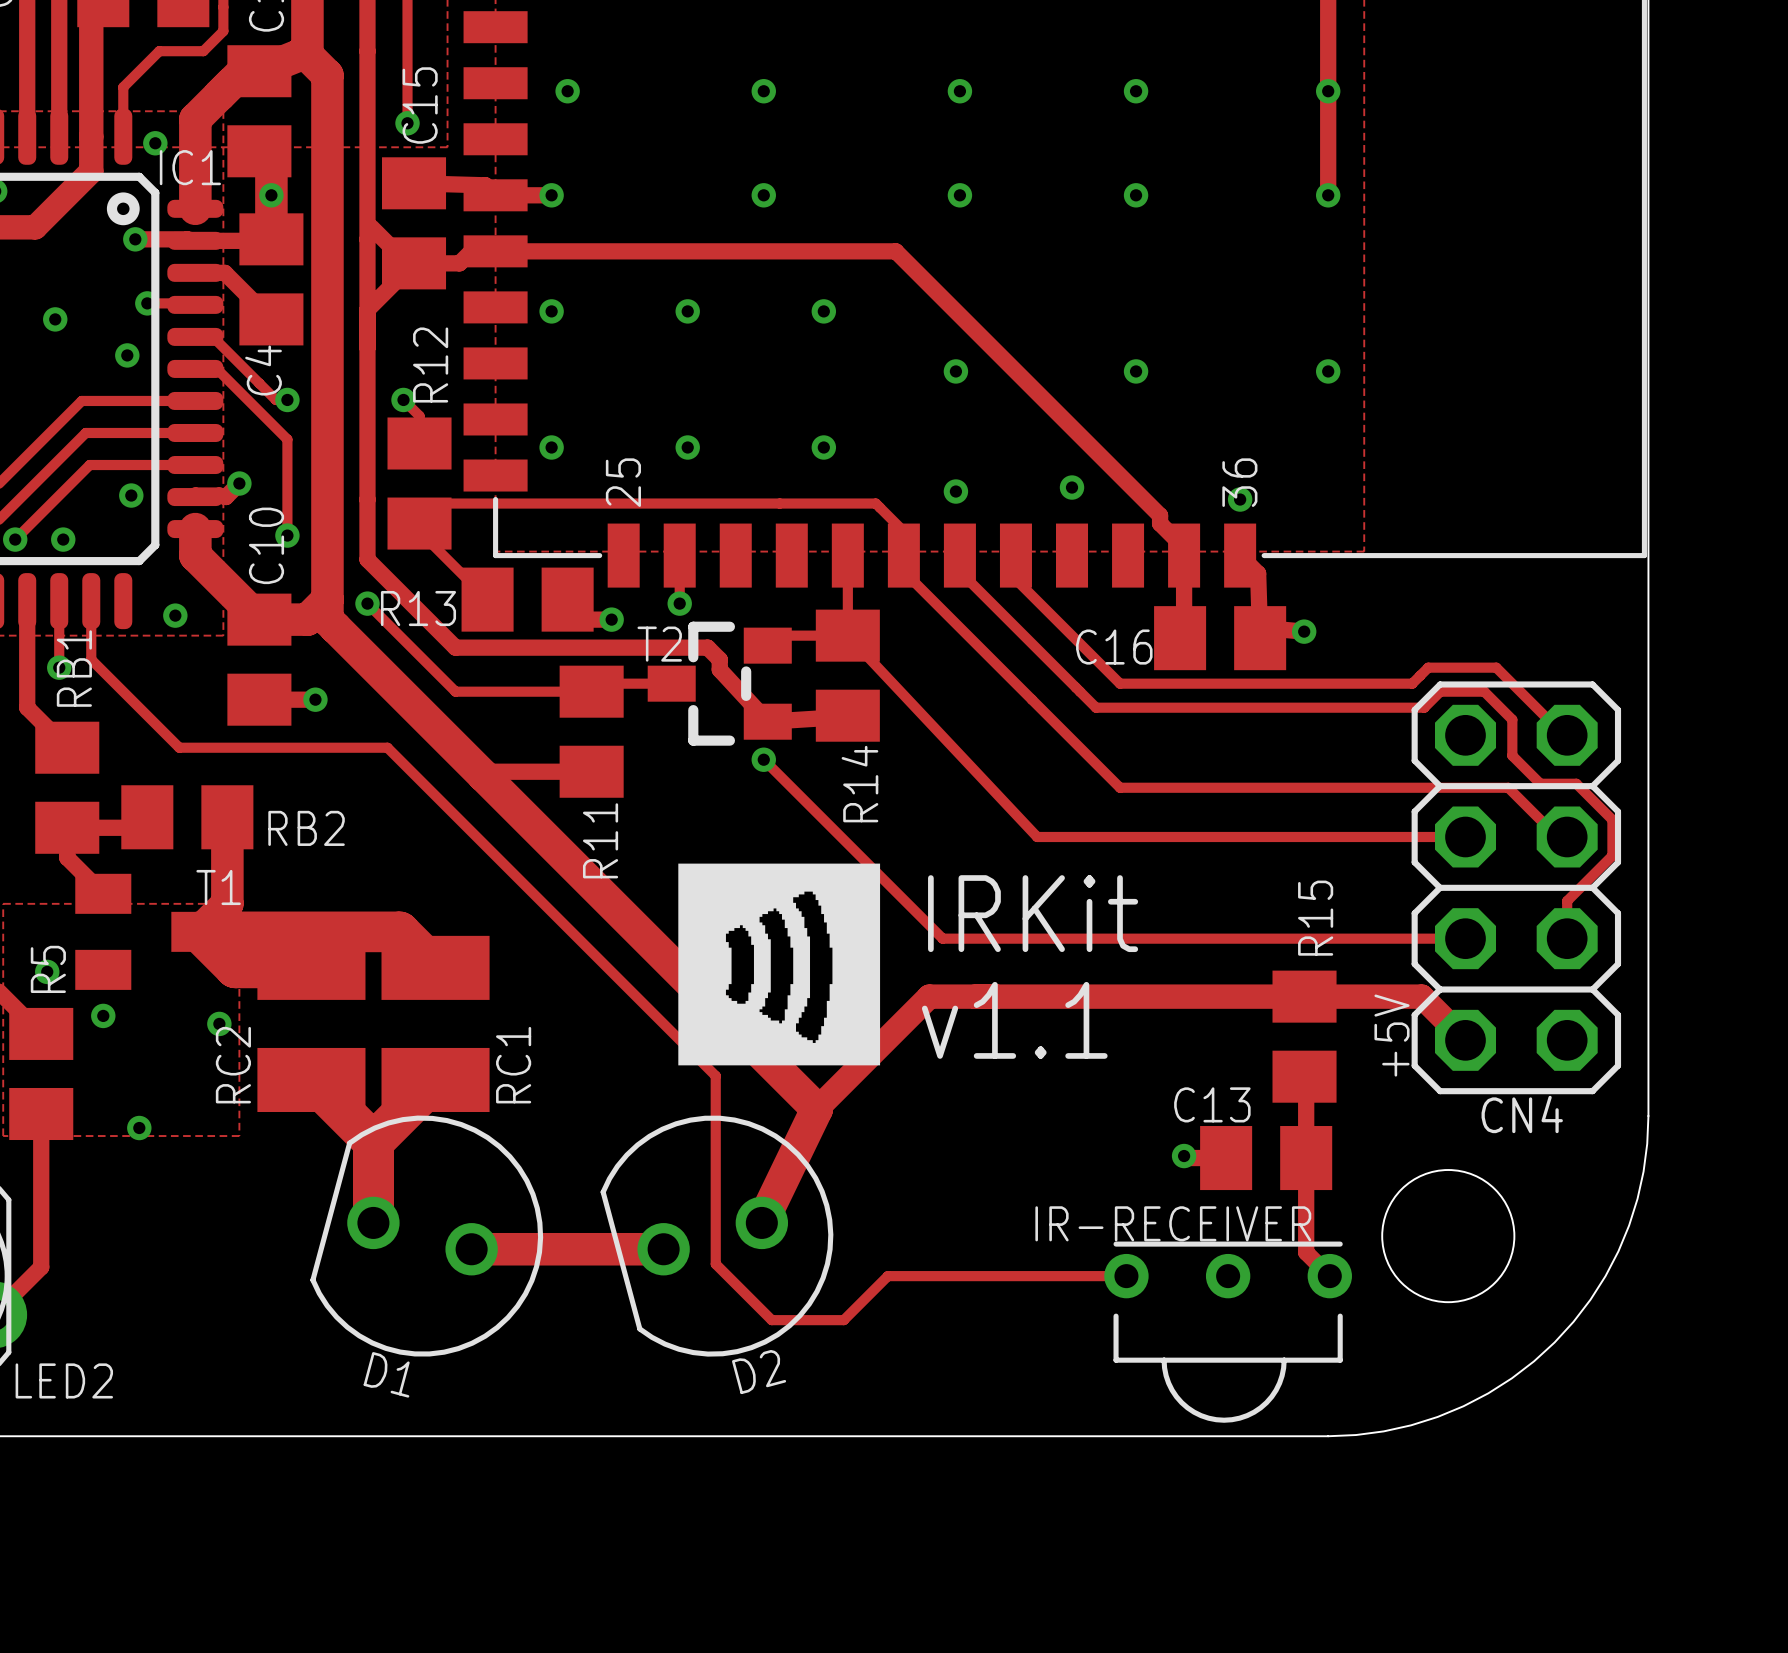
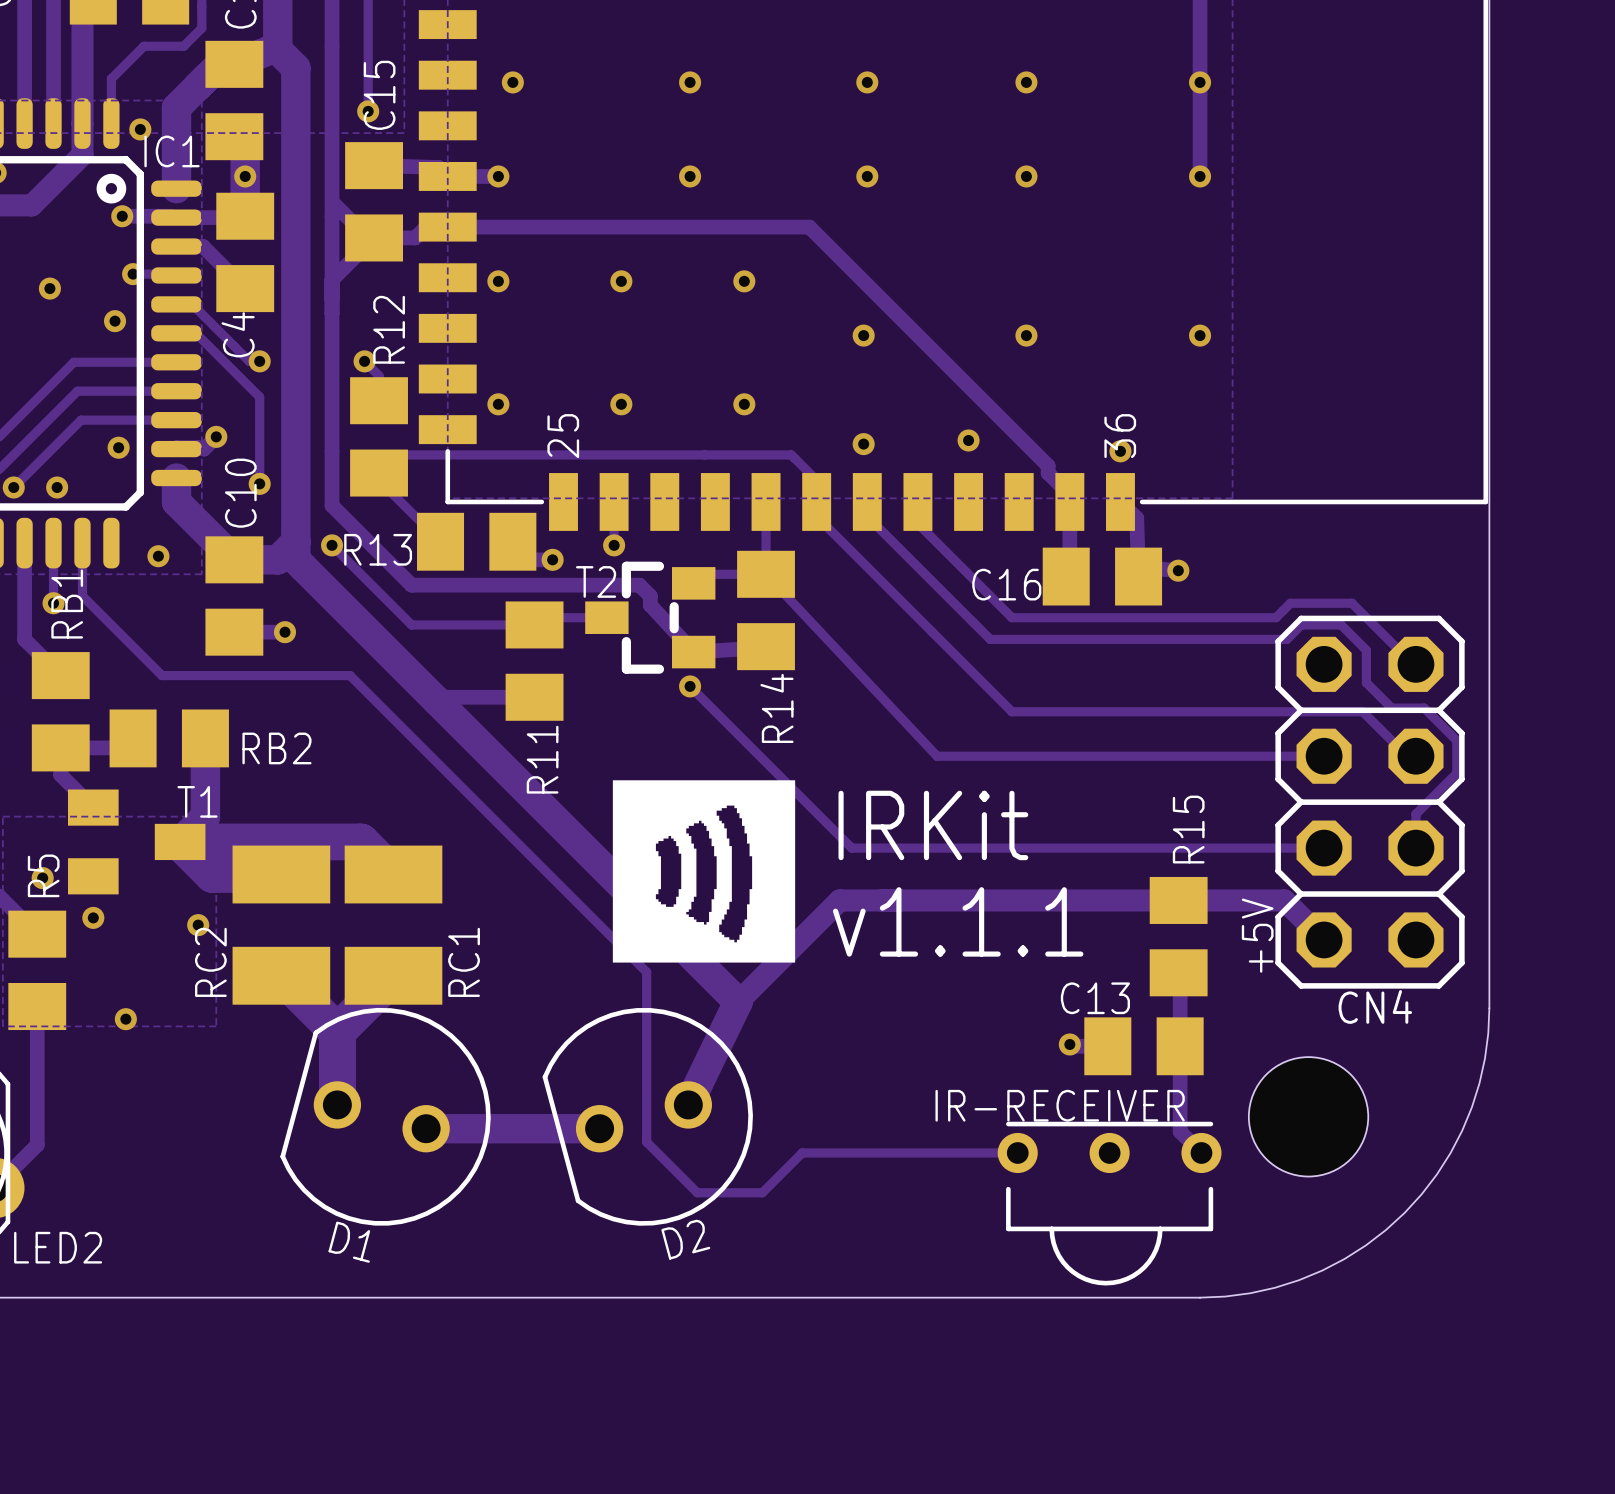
text: v1.1 (1014, 1020) -> v1.1.1 (958, 921)

